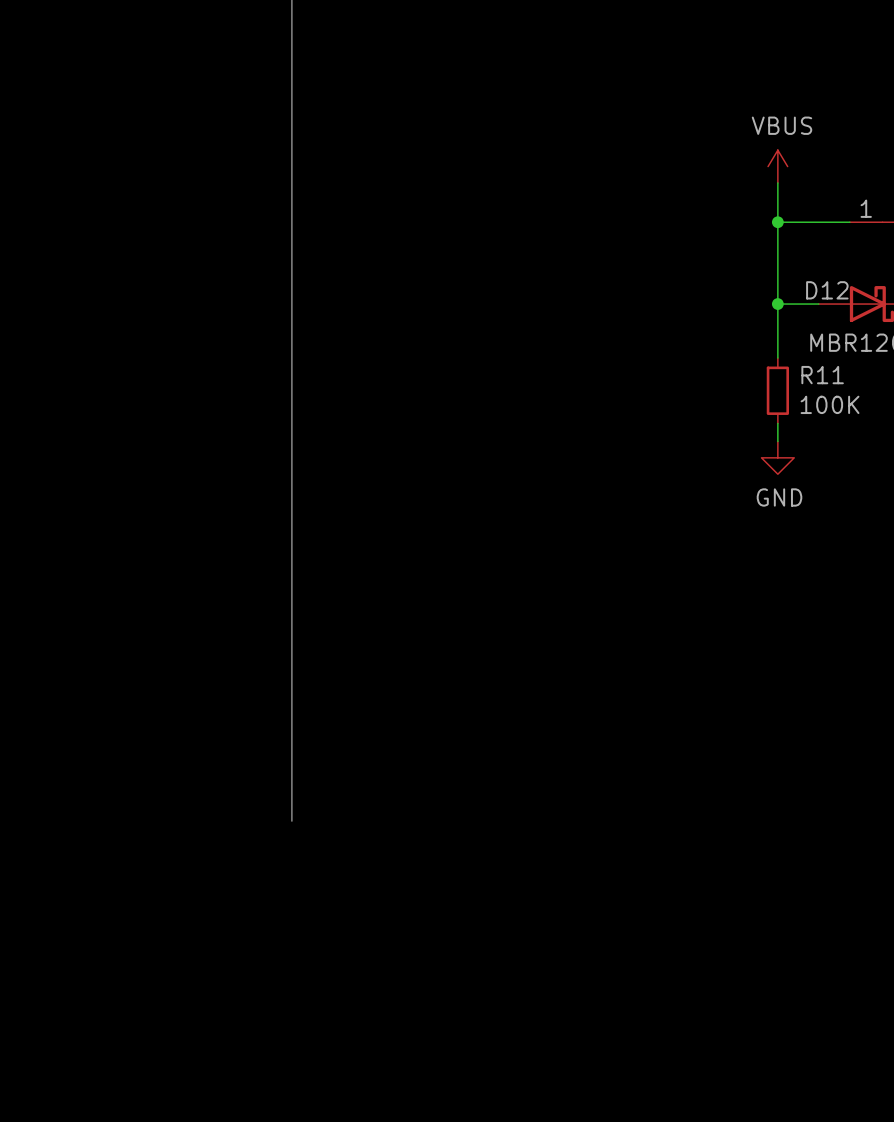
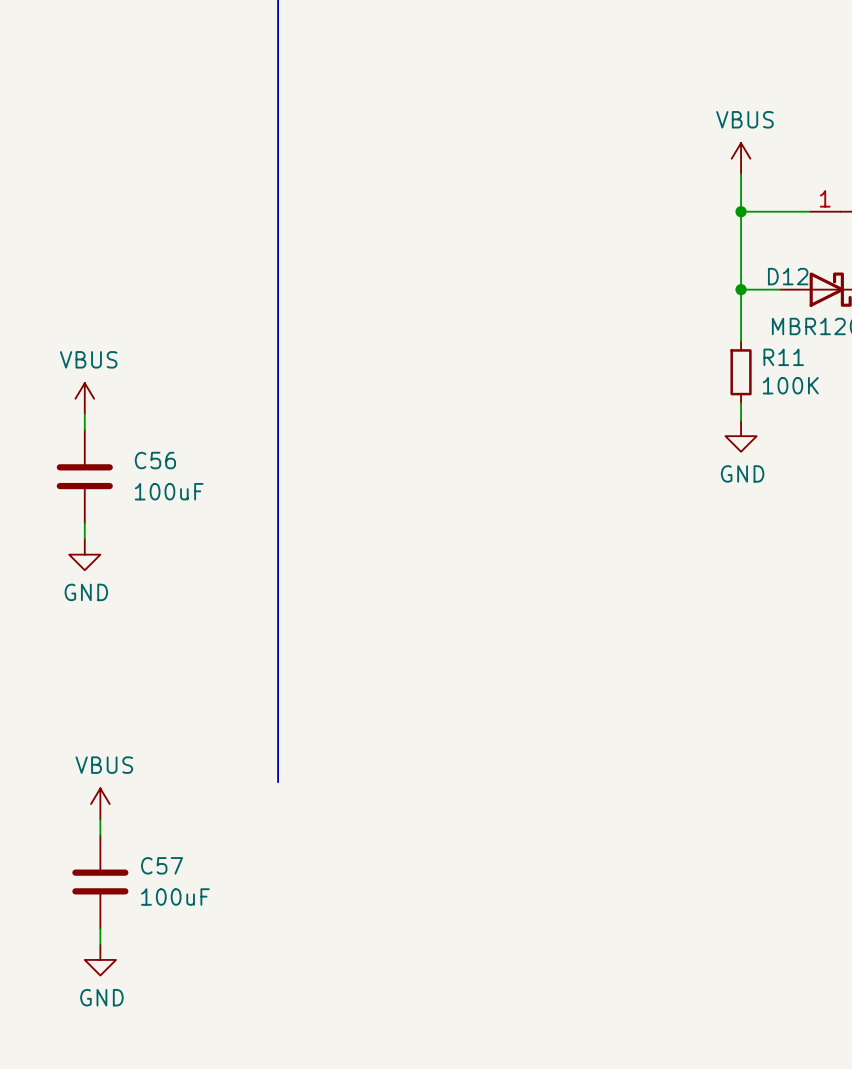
power symbol: none -> VBUS (84, 398)
wire: none -> (84, 414) (84, 429)
C56: none -> 100uF (84, 476)
wire: none -> (84, 523) (84, 539)
power symbol: none -> GND (84, 554)
power symbol: none -> VBUS (100, 804)
wire: none -> (100, 819) (100, 835)
C57: none -> 100uF (100, 882)
wire: none -> (100, 928) (100, 944)
power symbol: none -> GND (100, 959)

